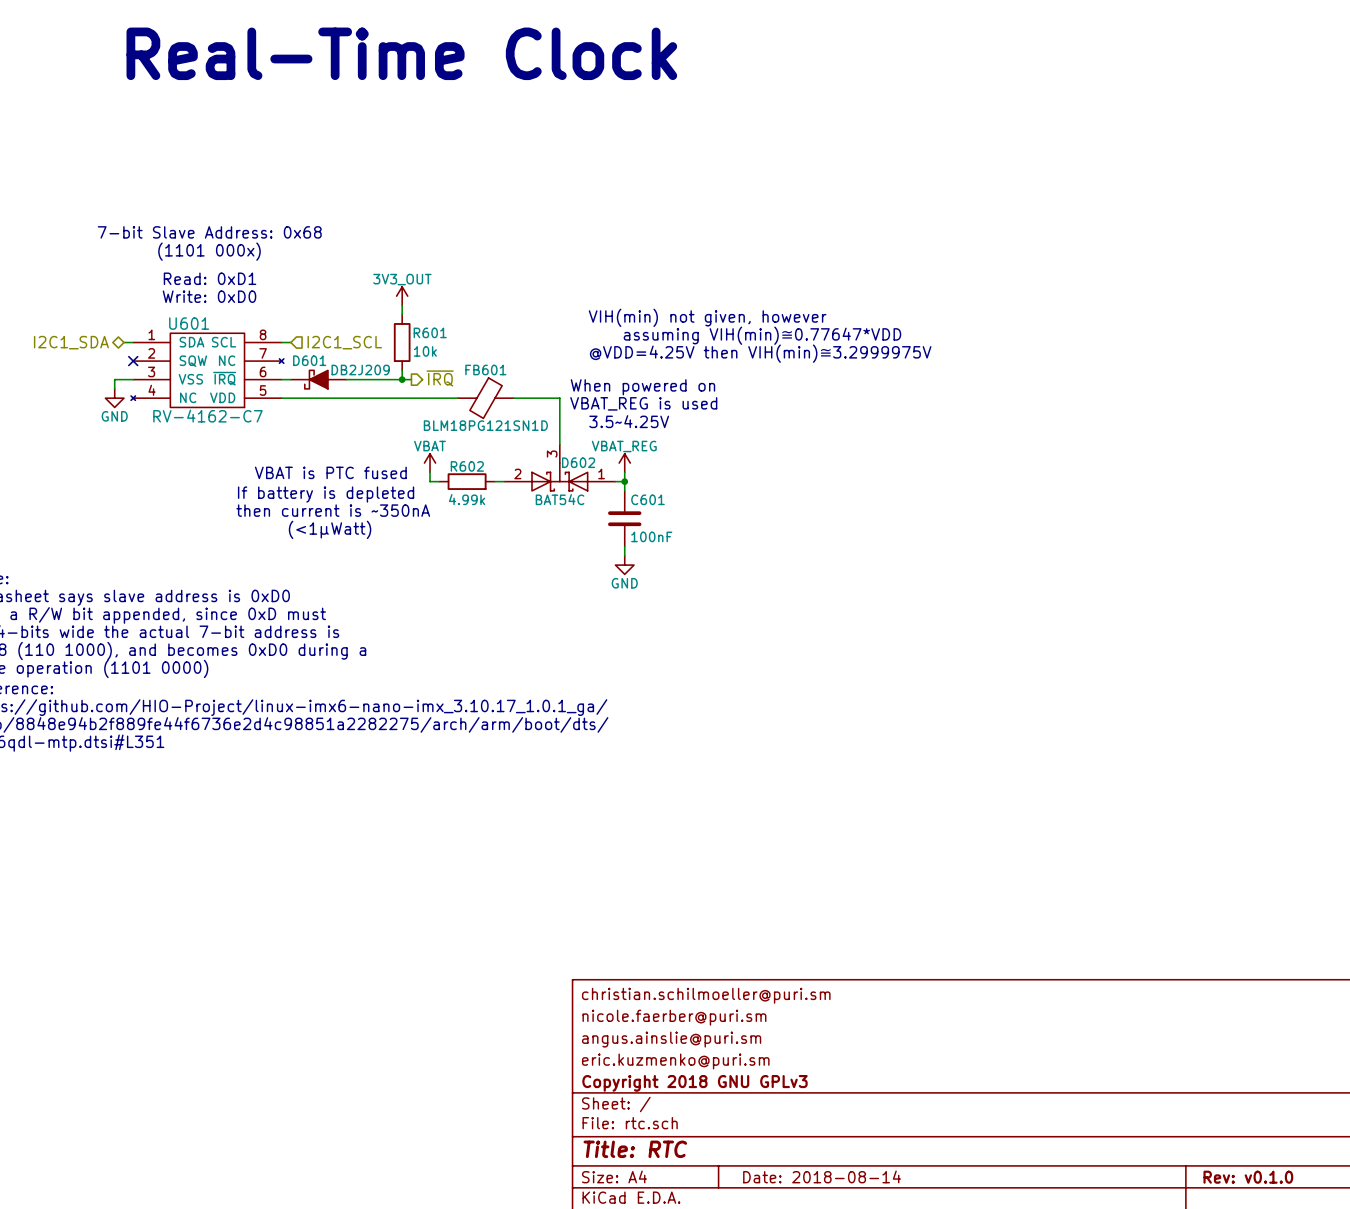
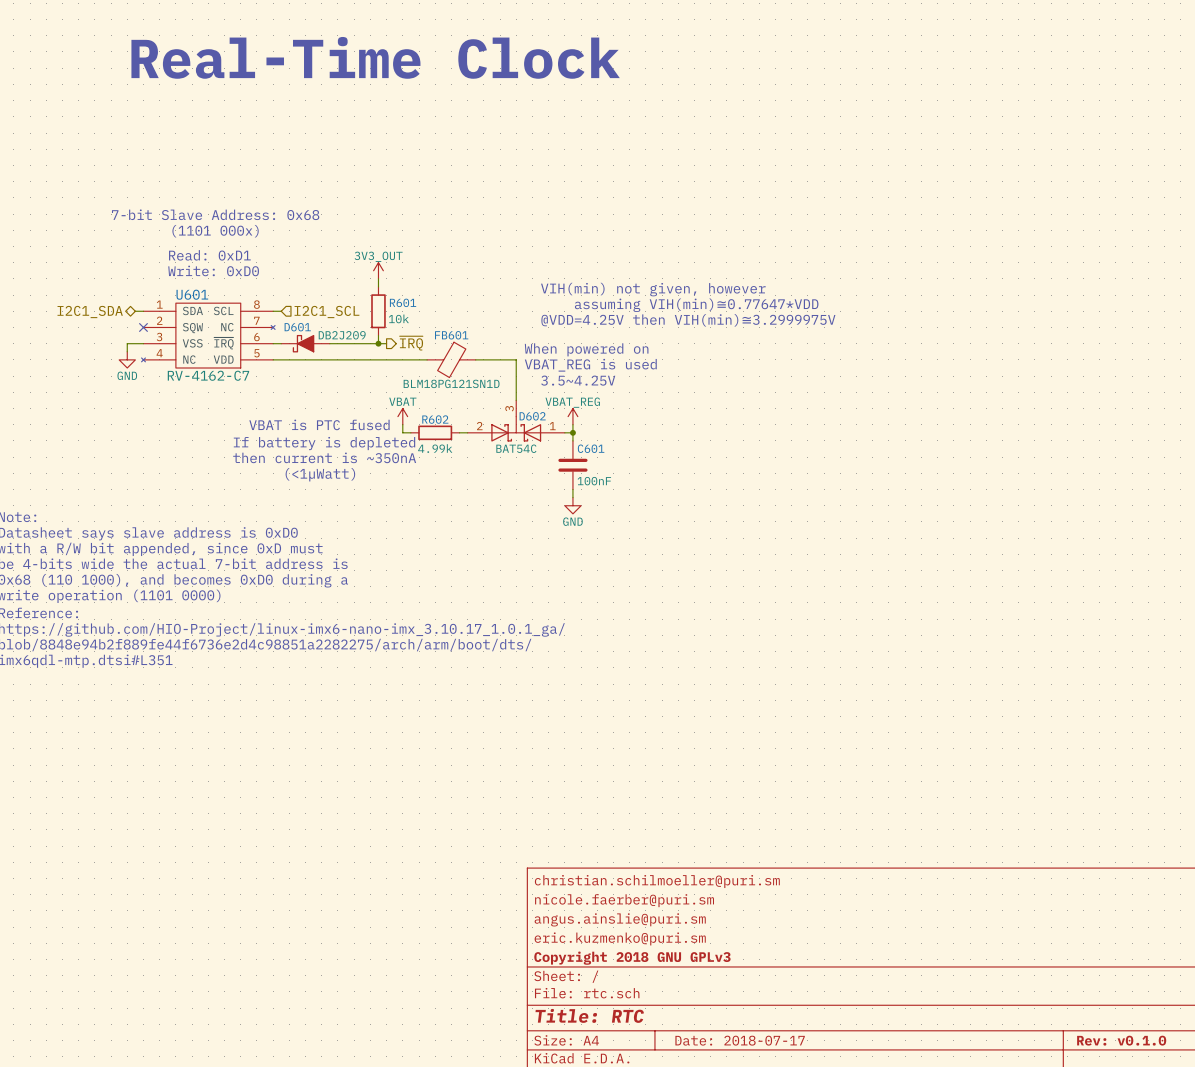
title block: Date: 2018-08-14 (822, 1176) -> Date: 2018-07-17 (740, 1040)

